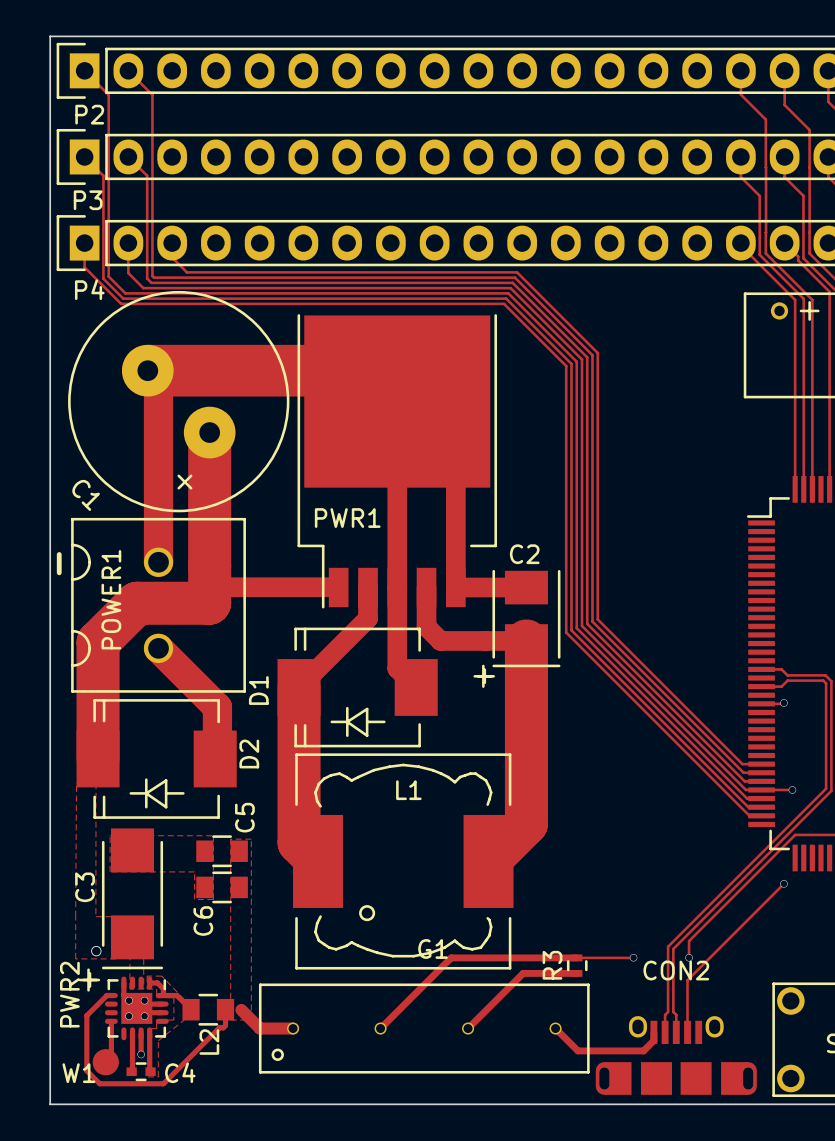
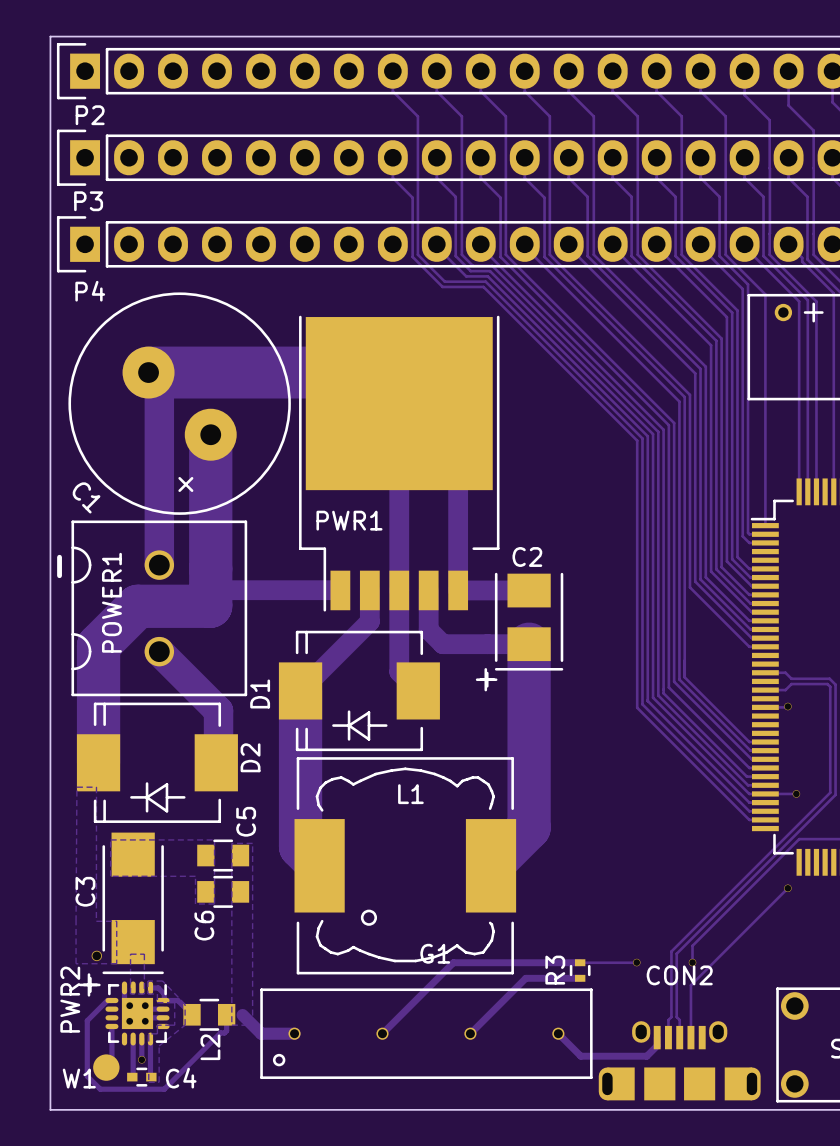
track: (84, 70) (108, 94) (108, 276) (125, 293) (508, 293) (576, 361) (576, 628) (747, 798) -> (436, 244) (436, 246) (466, 276) (487, 276) (647, 436) (647, 701) (750, 802)
track: (128, 70) (152, 94) (152, 276) (153, 277) (514, 277) (592, 355) (592, 621) (743, 772) -> (480, 244) (480, 246) (663, 429) (663, 693) (747, 776)
track: none -> (480, 71) (480, 91) (505, 116) (505, 254) (674, 423) (674, 681) (751, 759) (765, 759)
track: none -> (524, 71) (524, 91) (549, 116) (549, 254) (689, 394) (689, 587) (749, 646) (765, 646)
track: none -> (568, 71) (568, 91) (593, 116) (593, 254) (705, 366) (705, 577) (749, 620) (765, 620)
track: none -> (612, 71) (612, 91) (637, 116) (637, 254) (721, 338) (721, 567) (749, 594) (765, 594)
track: none -> (656, 71) (656, 91) (681, 116) (681, 254) (737, 310) (737, 557) (749, 568) (765, 568)
track: none -> (700, 71) (700, 91) (725, 116) (725, 254) (765, 294) (765, 525)
track: (84, 156) (103, 175) (103, 278) (123, 298) (506, 298) (571, 363) (571, 630) (748, 807) -> (392, 71) (392, 91) (417, 116) (417, 254) (444, 281) (485, 281) (642, 438) (642, 704) (749, 811) (752, 811)
track: (128, 156) (147, 175) (147, 278) (151, 282) (512, 282) (587, 357) (587, 623) (744, 781) -> (436, 71) (436, 91) (461, 116) (461, 254) (472, 265) (492, 265) (658, 431) (658, 695) (748, 785)
track: none -> (524, 157) (524, 177) (544, 197) (544, 256) (684, 397) (684, 677) (749, 742) (765, 742)
track: none -> (568, 157) (568, 177) (587, 196) (587, 256) (700, 368) (700, 579) (750, 629) (765, 629)
track: none -> (612, 157) (612, 177) (631, 196) (631, 256) (716, 340) (716, 569) (750, 603) (765, 603)
track: none -> (656, 157) (656, 177) (675, 196) (675, 256) (732, 312) (732, 559) (750, 577) (765, 577)
track: none -> (700, 157) (700, 177) (719, 196) (719, 256) (748, 284) (748, 532) (765, 534)
track: (84, 243) (84, 267) (121, 303) (504, 303) (566, 366) (566, 632) (749, 815) -> (392, 157) (392, 177) (412, 197) (412, 256) (442, 286) (483, 286) (637, 440) (637, 707) (749, 819) (753, 819)
track: (128, 243) (128, 273) (143, 288) (510, 288) (581, 359) (581, 625) (745, 789) -> (436, 157) (436, 177) (455, 196) (455, 256) (470, 271) (490, 271) (653, 434) (653, 697) (749, 793)
track: none -> (524, 244) (524, 246) (679, 401) (679, 679) (750, 750) (765, 750)
track: none -> (568, 244) (568, 246) (695, 373) (695, 581) (751, 638) (765, 638)
track: none -> (612, 244) (612, 246) (711, 345) (711, 571) (751, 612) (765, 612)
track: none -> (656, 244) (656, 246) (726, 317) (726, 561) (751, 586) (765, 586)
track: none -> (700, 244) (700, 246) (742, 289) (742, 536) (749, 542) (765, 542)
track: (172, 257) (186, 272) (517, 272) (597, 353) (597, 619) (742, 764) (745, 764) -> (480, 157) (480, 177) (500, 197) (500, 256) (668, 425) (668, 687) (749, 767)

